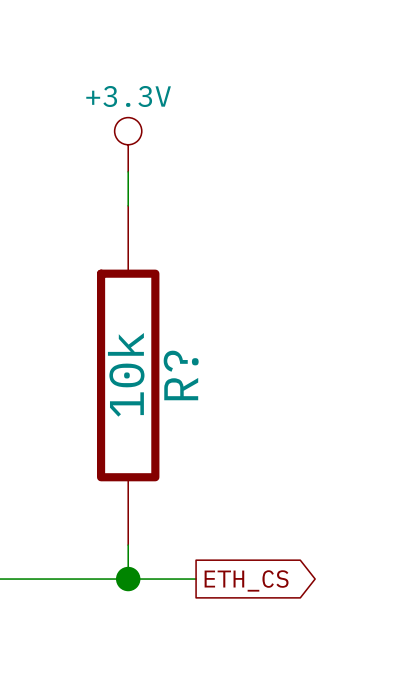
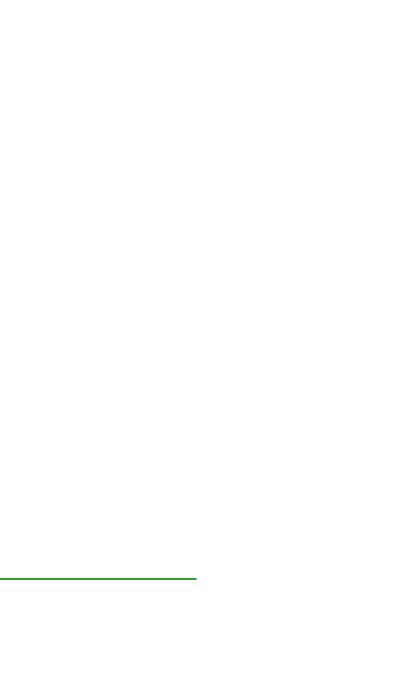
power symbol: +3.3V (128, 144) -> none
wire: (128, 171) (128, 205) -> none
R?: 10k (128, 375) -> none
wire: (128, 545) (128, 579) -> none
junction: (128, 579) -> none
global label: ETH_CS (246, 580) -> none

